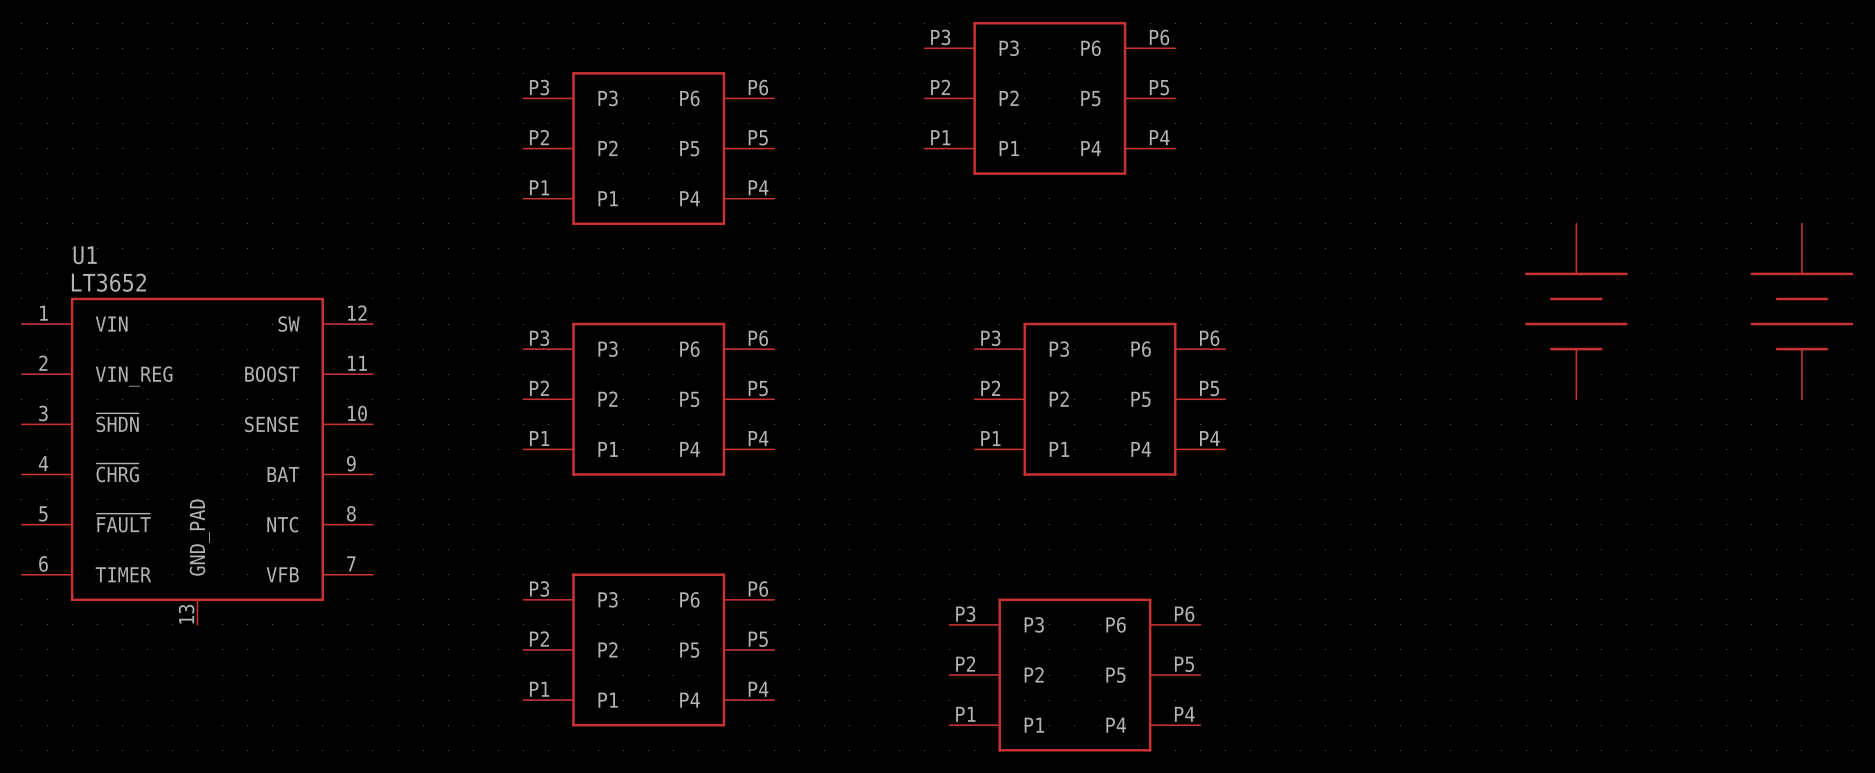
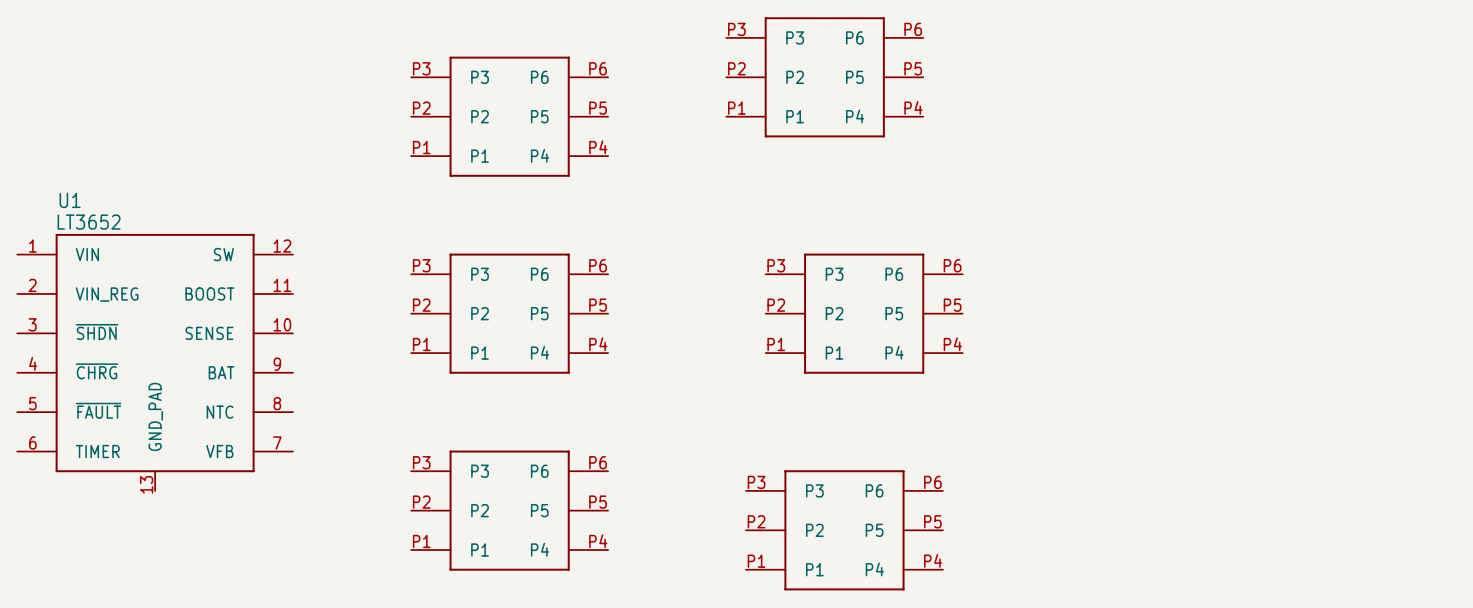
part: (1576, 311) -> none
part: (1801, 311) -> none

